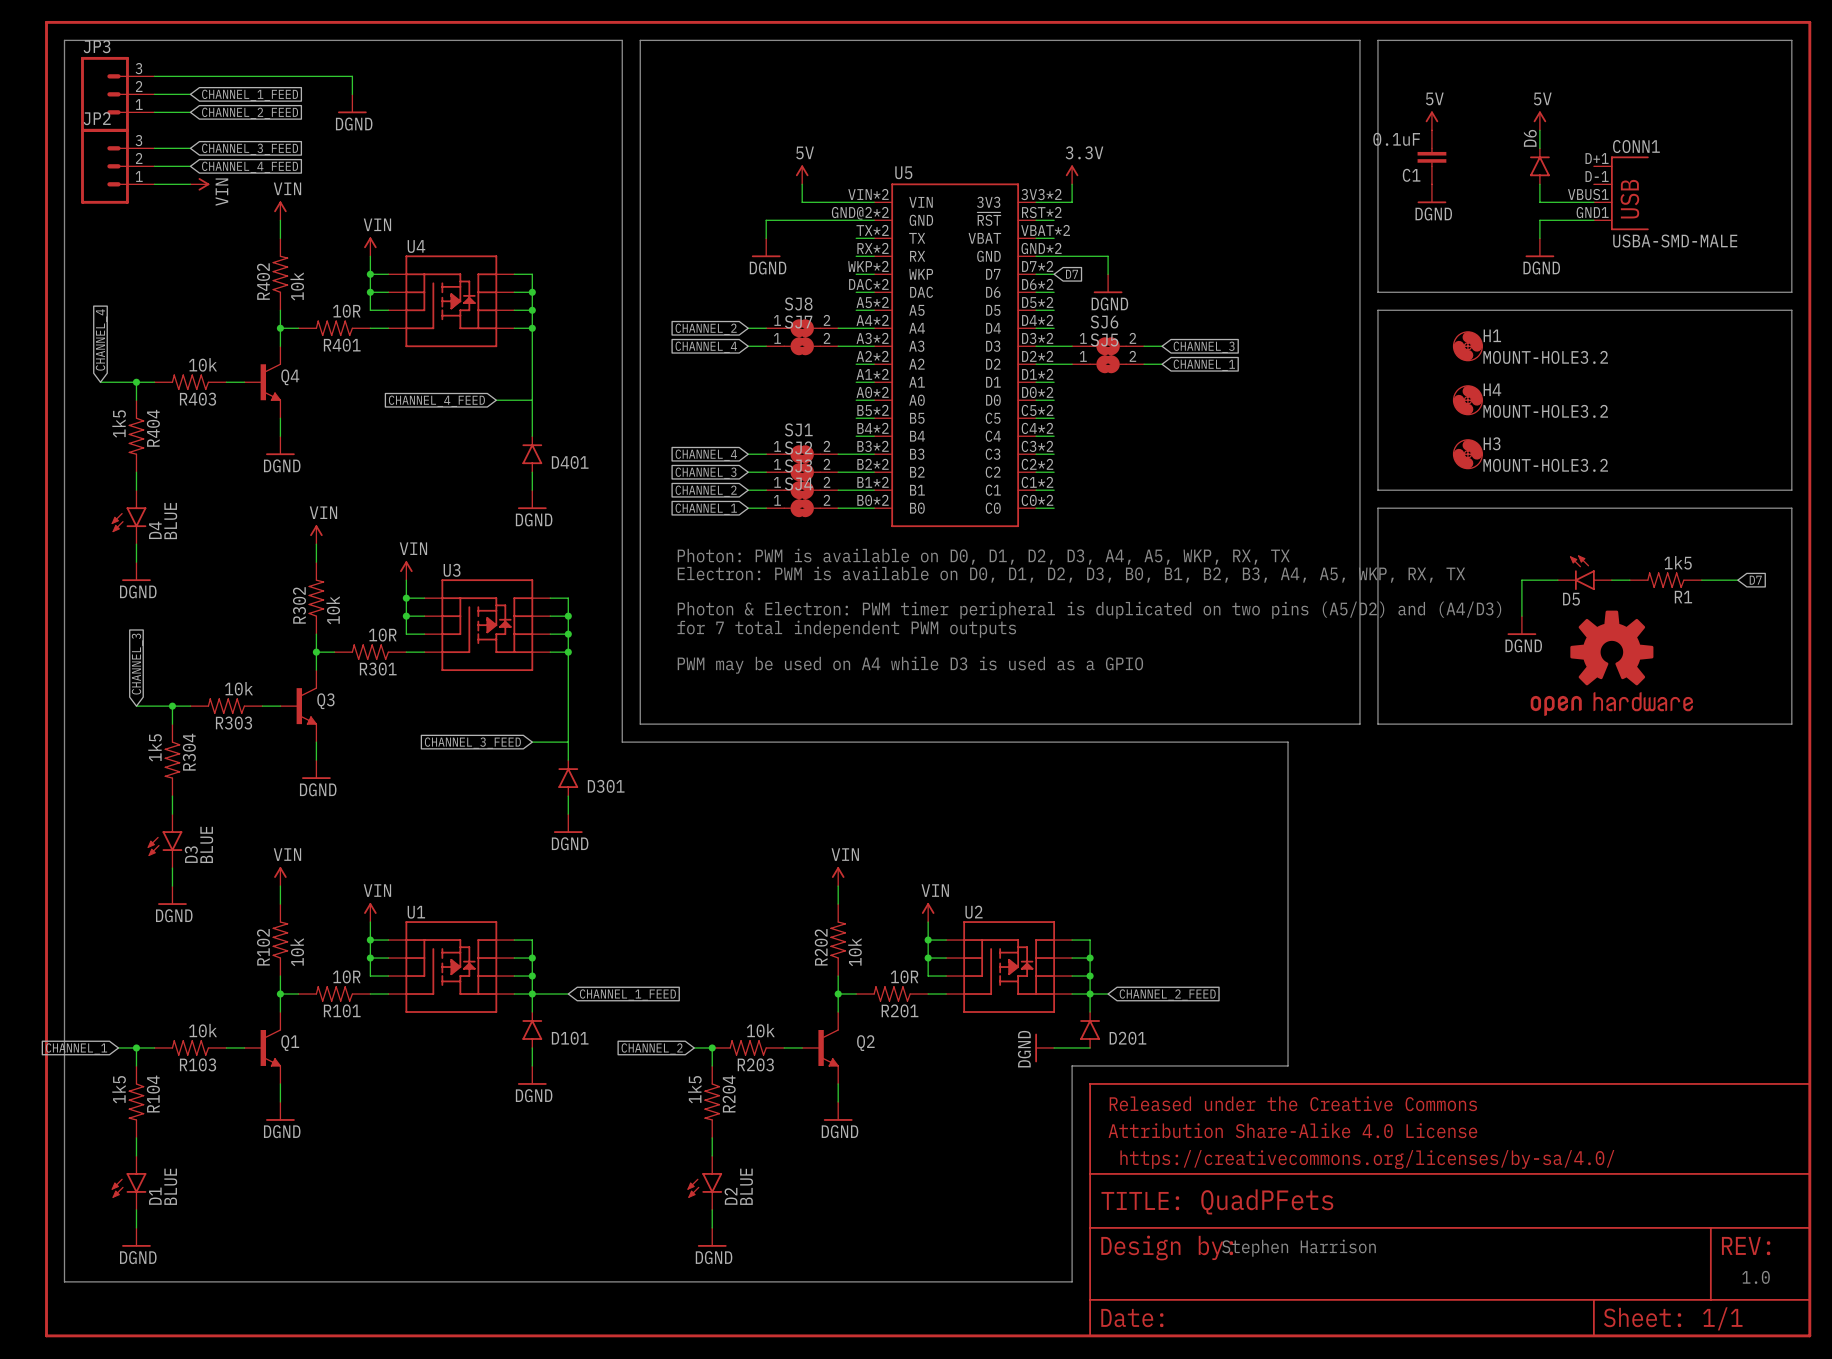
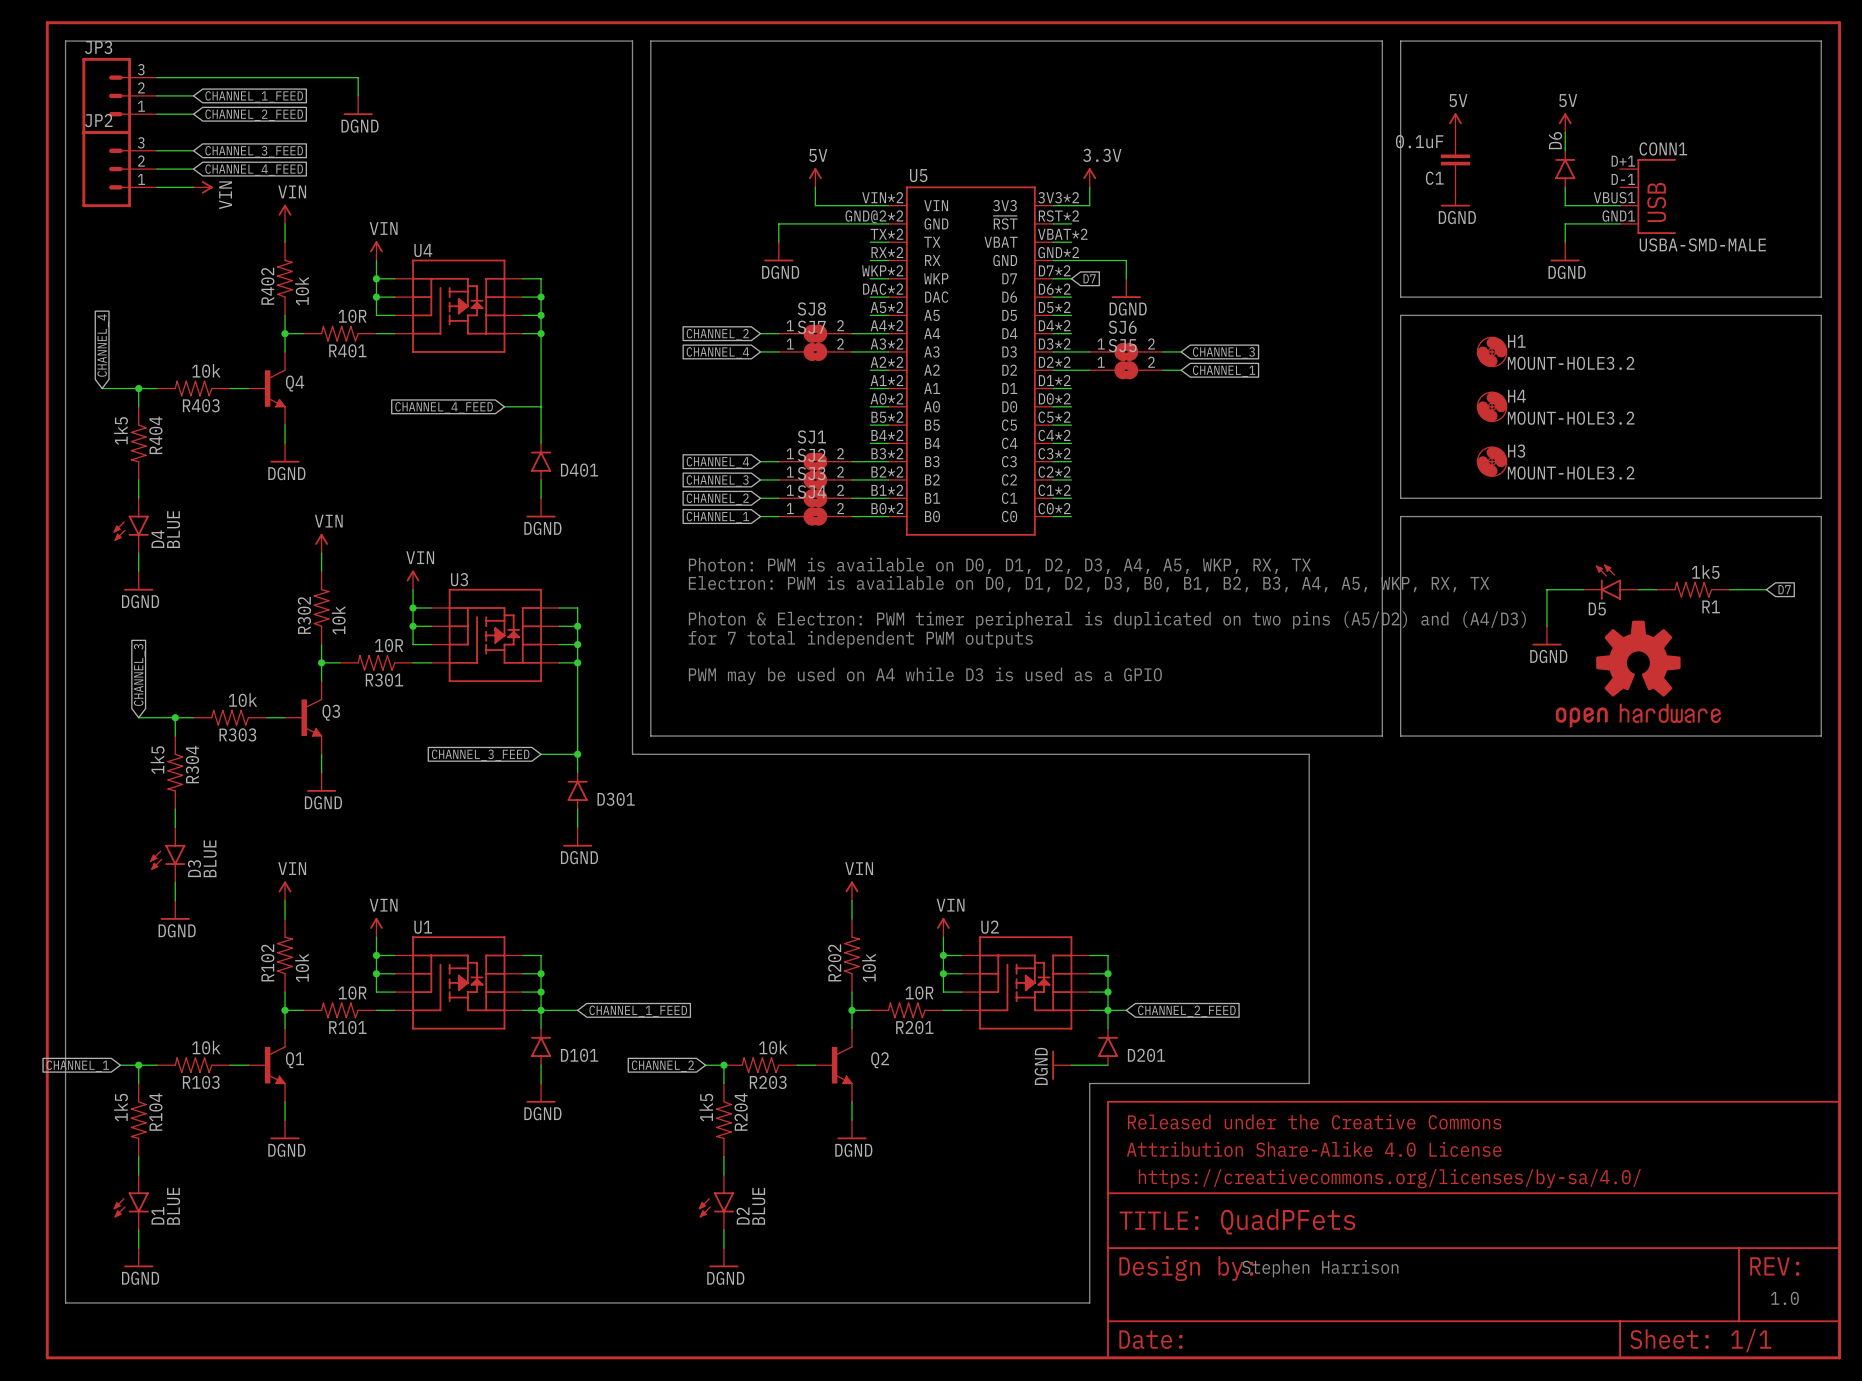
junction: none -> (577, 754)

